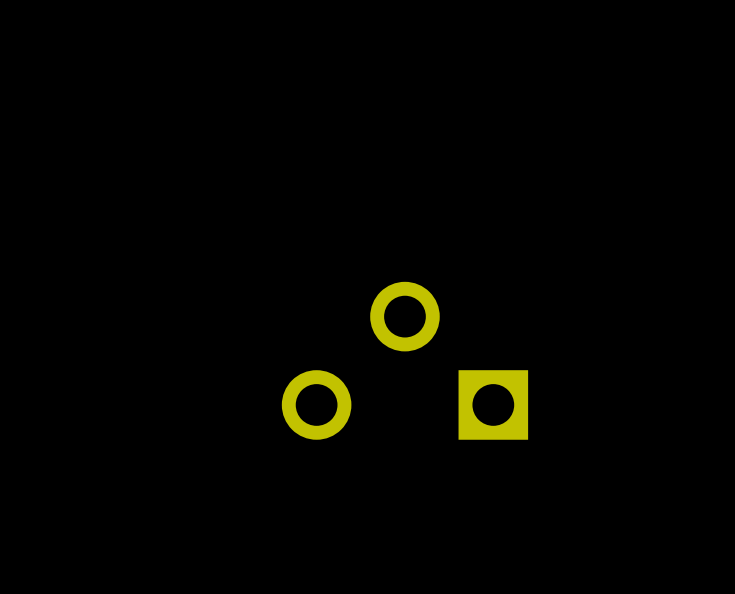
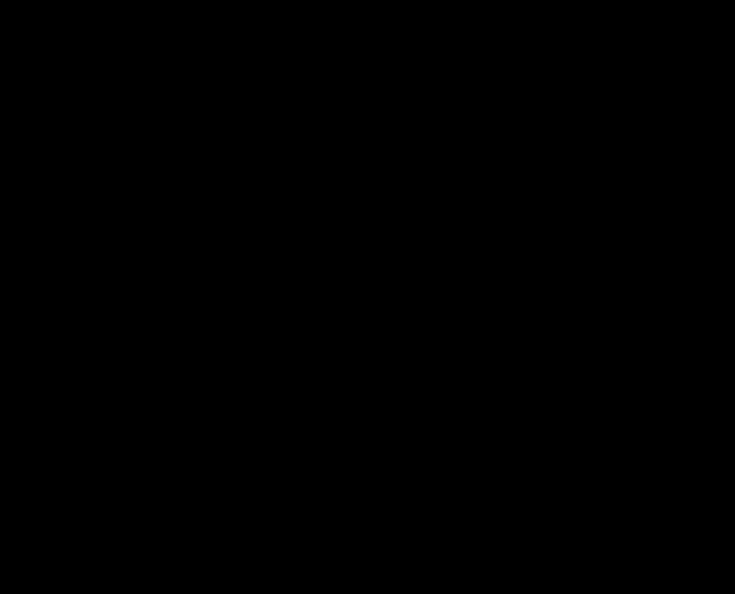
part: (404, 360) -> none

